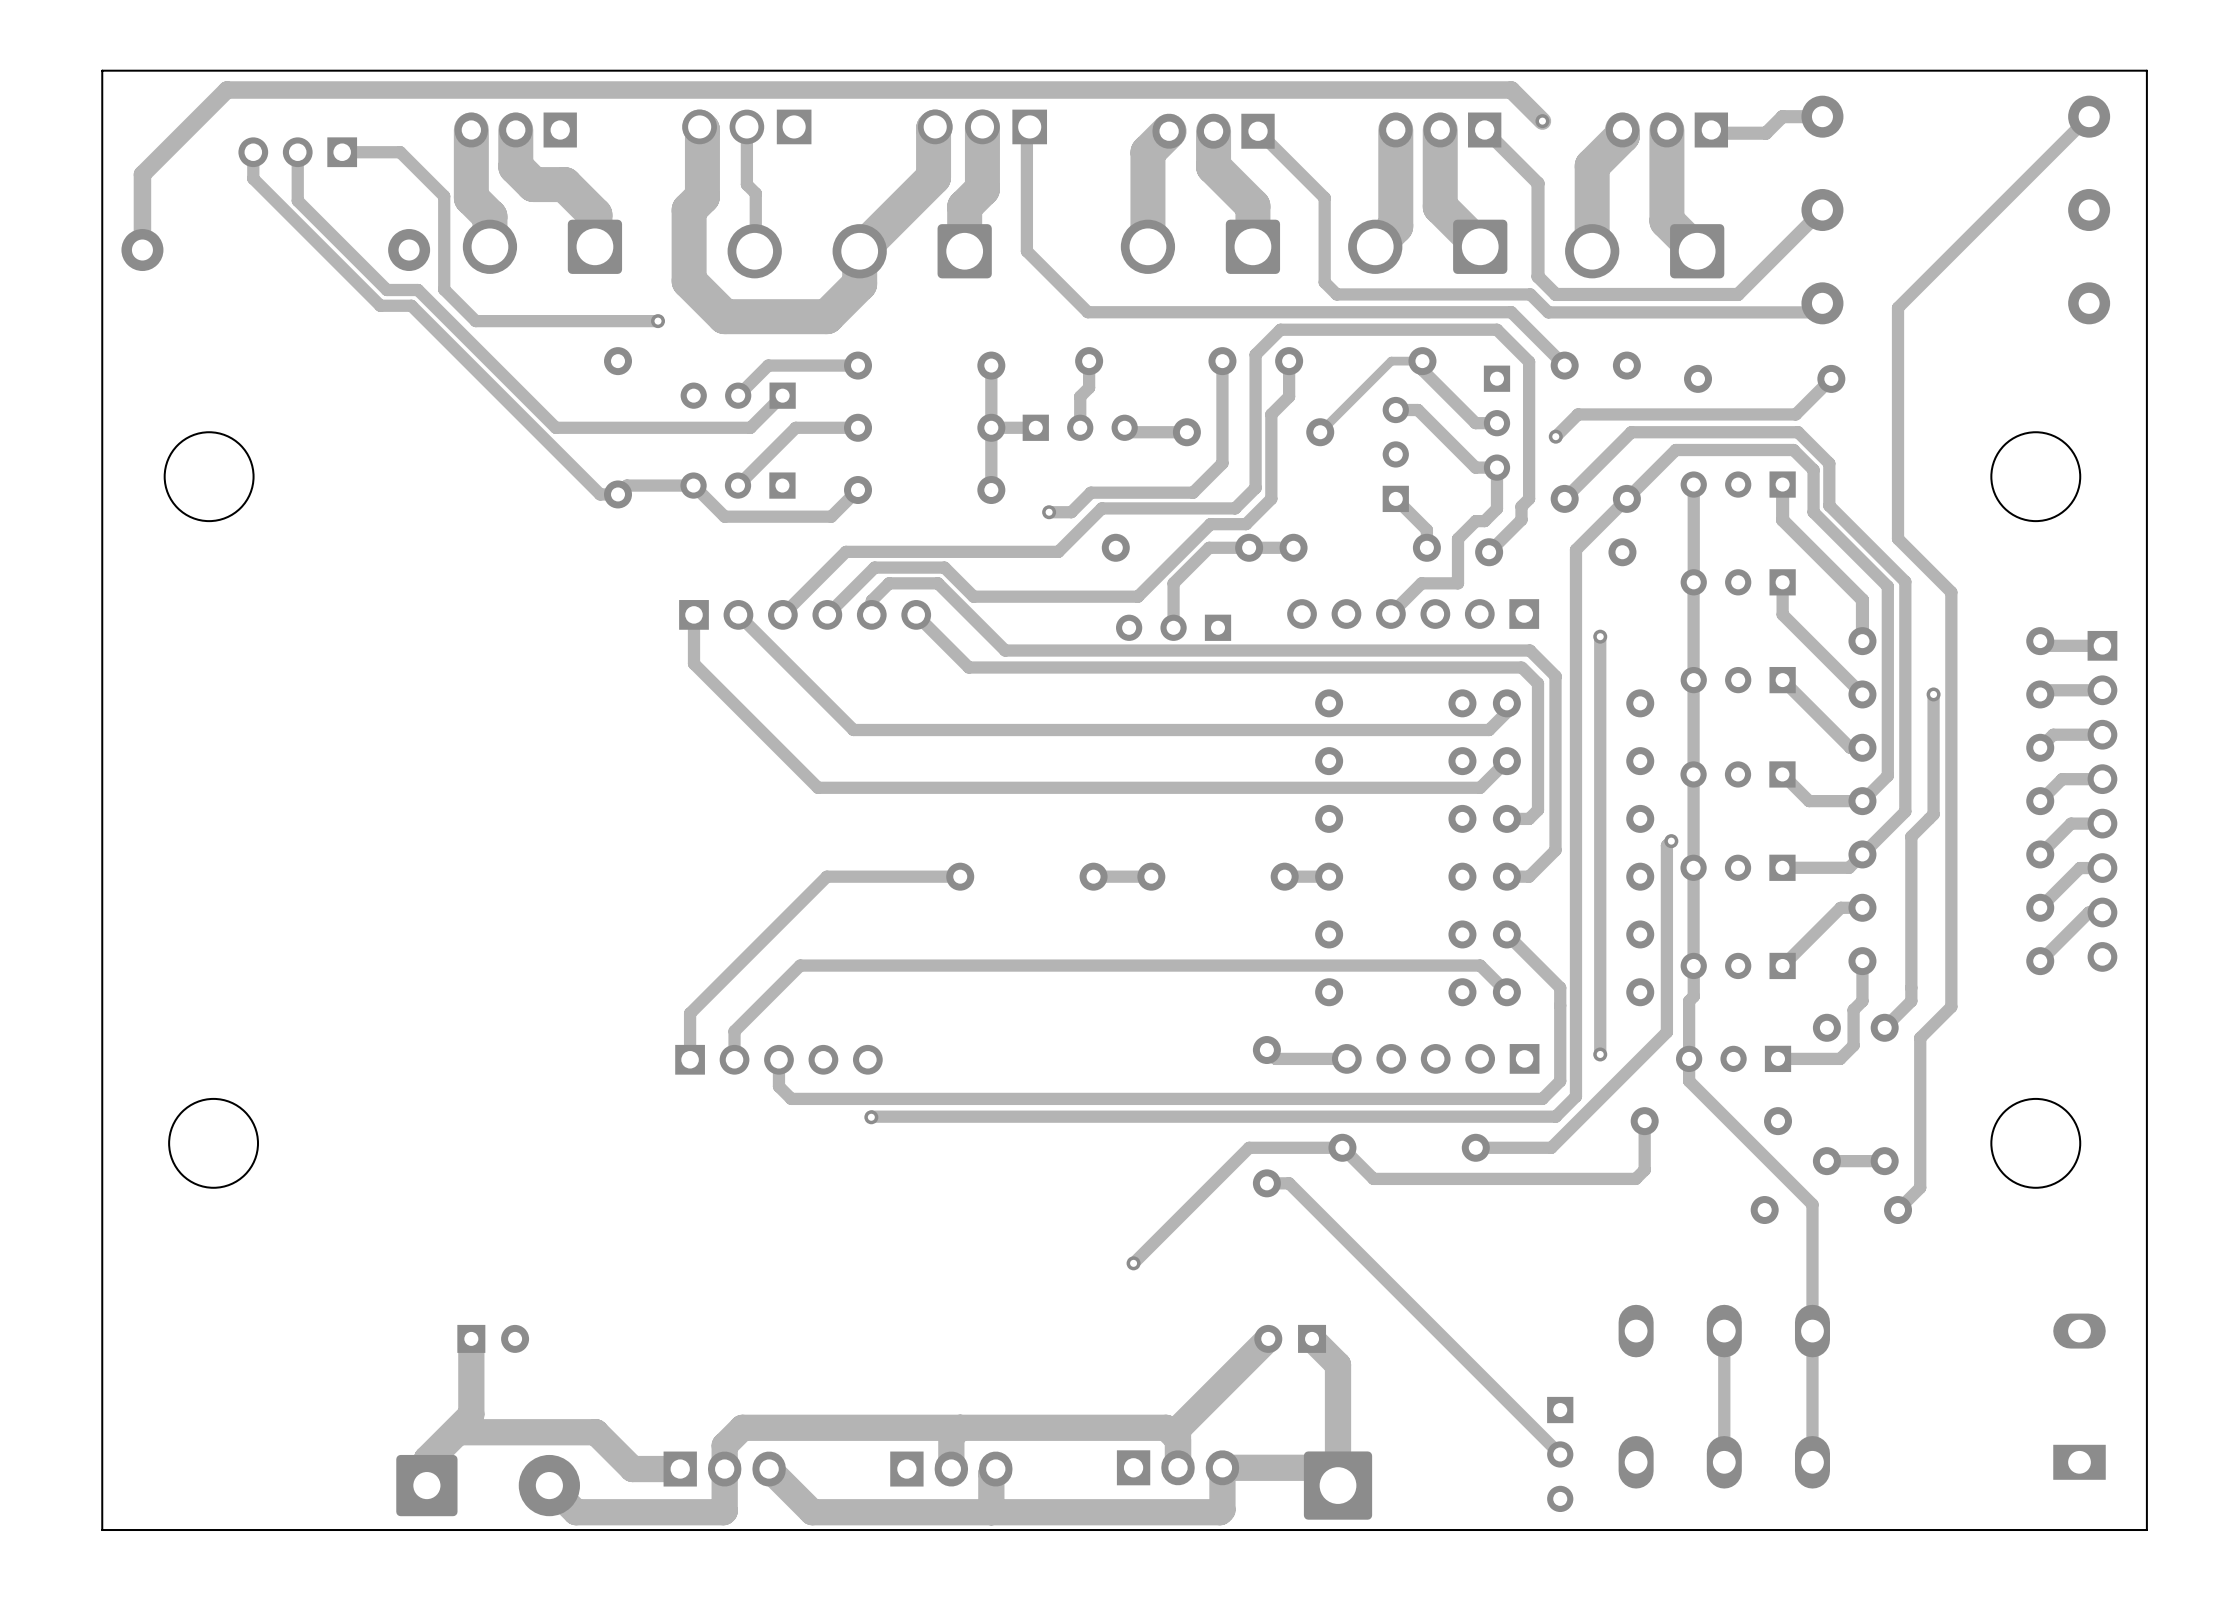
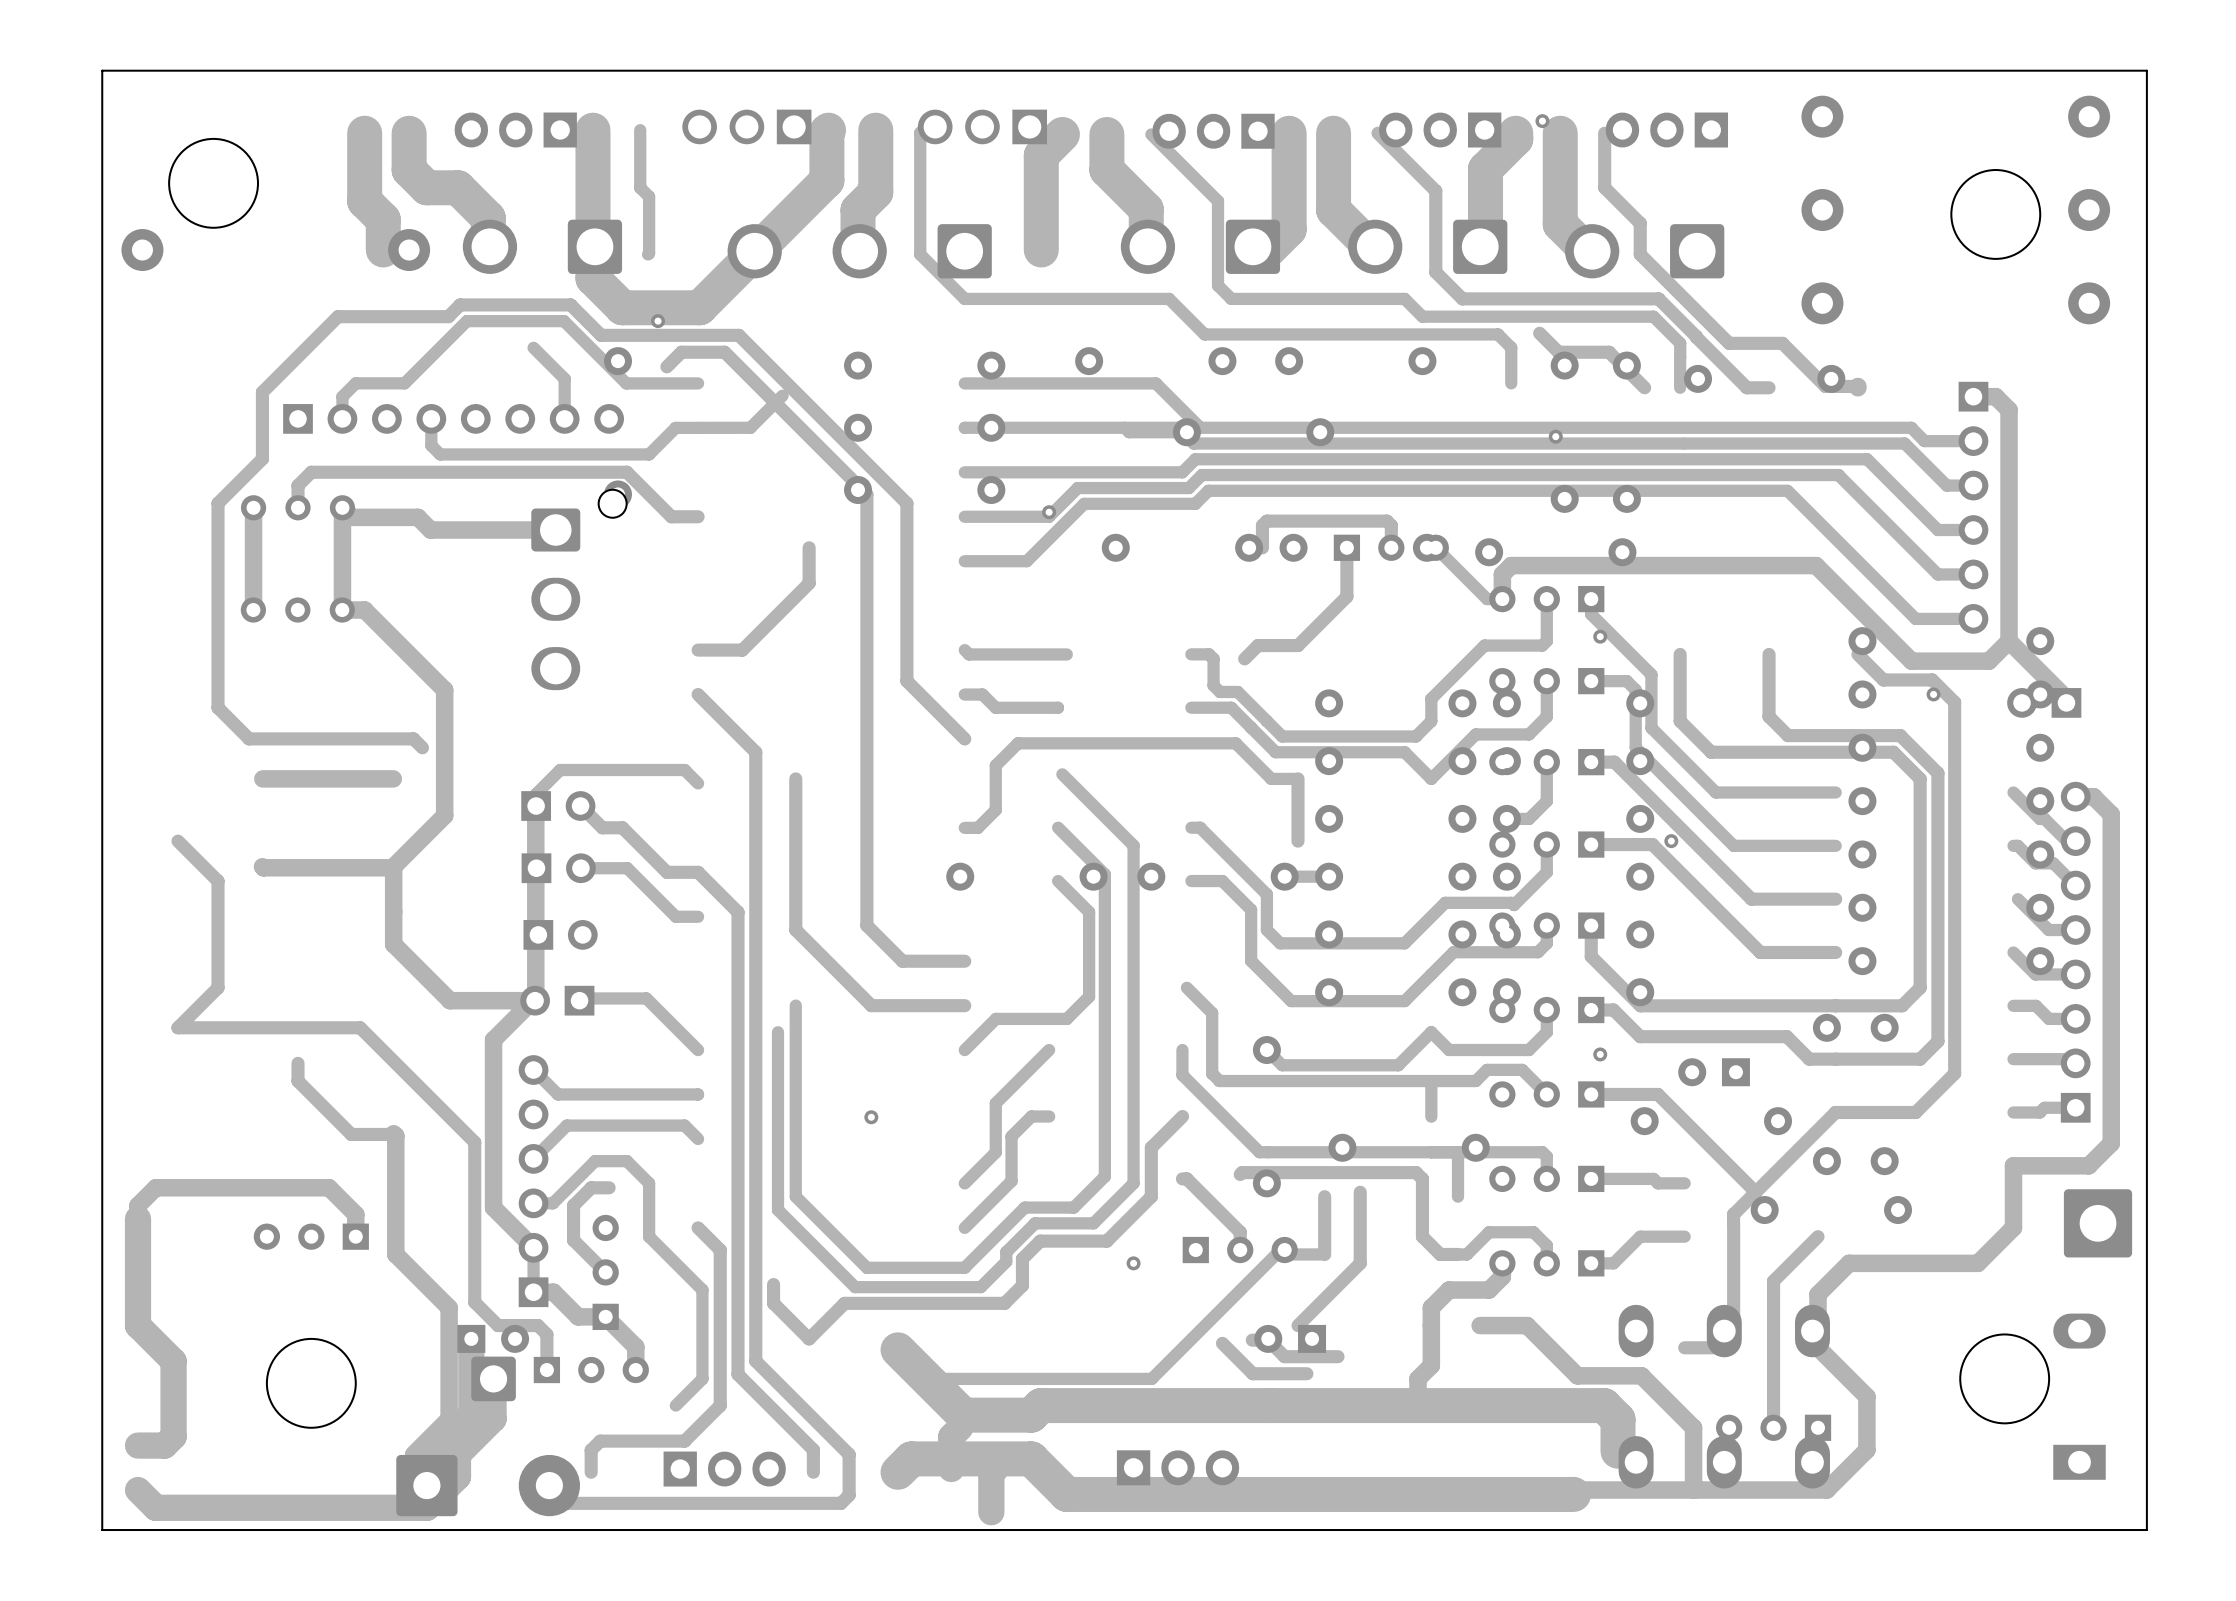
track: (1822, 116) (1782, 116) (1765, 133) (1711, 133) -> none
track: (2089, 116) (1898, 307) (1898, 538) (1951, 592) (1951, 1006) (1920, 1038) (1920, 1187) (1898, 1210) -> none
track: (1542, 121) (1511, 90) (226, 90) (142, 174) (142, 250) -> none
track: (746, 126) (746, 184) (755, 193) (754, 251) -> (640, 130) (640, 187) (649, 196) (648, 254)
track: (935, 126) (933, 128) (933, 177) (859, 251) (859, 283) (826, 316) (724, 316) (689, 281) (689, 210) (702, 196) (702, 129) (699, 126) -> none
track: (982, 126) (982, 189) (964, 206) (964, 251) -> (875, 130) (875, 192) (858, 210) (858, 254)
track: (1029, 126) (1026, 129) (1026, 251) (1087, 312) (1511, 312) (1564, 365) -> none
track: (471, 130) (471, 197) (489, 216) (489, 246) -> (364, 133) (364, 201) (383, 219) (383, 250)
track: (515, 130) (515, 166) (533, 184) (564, 184) (594, 214) (594, 246) -> (409, 133) (409, 170) (426, 187) (458, 187) (488, 218) (488, 250)
track: none -> (828, 130) (826, 131) (826, 180) (699, 307) (622, 307) (592, 278) (592, 130)
track: none -> (923, 130) (920, 132) (920, 254) (964, 298) (1169, 298) (1204, 334) (1498, 334) (1511, 347) (1511, 383)
track: (1395, 130) (1395, 226) (1375, 246) -> (1289, 133) (1289, 229) (1268, 250)
track: (1440, 130) (1440, 206) (1480, 246) -> (1333, 133) (1333, 210) (1373, 250)
track: (1484, 130) (1538, 183) (1538, 276) (1555, 294) (1738, 294) (1822, 210) -> none
track: (1622, 130) (1622, 135) (1592, 165) (1592, 251) -> (1515, 133) (1515, 138) (1485, 169) (1485, 254)
track: (1666, 130) (1666, 220) (1697, 251) -> (1560, 133) (1560, 224) (1590, 254)
track: (1169, 131) (1147, 152) (1147, 246) -> (1062, 134) (1041, 155) (1041, 250)
track: (1213, 131) (1213, 166) (1252, 206) (1252, 246) -> (1106, 134) (1106, 170) (1146, 209) (1146, 250)
track: (1258, 131) (1324, 197) (1324, 282) (1336, 294) (1530, 294) (1548, 312) (1813, 312) (1822, 303) -> none
track: none -> (1378, 133) (1435, 190) (1435, 272) (1462, 298) (1658, 298) (1746, 387) (1769, 387)
track: none -> (1604, 133) (1604, 187) (1640, 223) (1640, 254) (1729, 343) (1782, 343) (1825, 386) (1857, 387)
track: none -> (1151, 134) (1218, 201) (1218, 285) (1231, 298) (1404, 298) (1422, 316) (1653, 316) (1680, 343) (1680, 387)
track: (253, 152) (253, 178) (380, 305) (411, 305) (600, 494) (618, 494) (626, 485) (693, 485) (724, 516) (831, 516) (858, 490) -> none
track: (297, 152) (297, 200) (386, 290) (418, 290) (555, 427) (675, 427) -> (431, 418) (431, 445) (440, 454) (649, 454) (675, 427)
part: (297, 152) -> none
track: (342, 152) (400, 152) (444, 196) (444, 289) (475, 321) -> (342, 418) (342, 396) (355, 383) (404, 383) (466, 321) (475, 321)
track: (658, 321) (564, 321) -> (698, 383) (626, 383) (564, 321)
track: none -> (1539, 333) (1558, 352) (1609, 352) (1644, 387)
track: none -> (533, 347) (564, 378) (564, 418)
track: (1089, 361) (1089, 387) (1080, 396) (1080, 427) -> none
track: (1222, 361) (1222, 463) (1193, 492) (1090, 492) (1071, 512) (1049, 512) -> none
track: (1289, 361) (1289, 396) (1271, 414) (1271, 498) (1246, 524) (1210, 524) (1137, 596) (973, 596) (944, 567) (874, 567) (827, 614) -> none
track: (858, 365) (768, 365) (738, 395) -> none
track: (991, 365) (991, 490) -> none
track: none -> (666, 366) (681, 352) (724, 352) (866, 494) (866, 925) (902, 961) (964, 961)
track: (1831, 378) (1795, 414) (1578, 414) (1555, 436) -> none
track: none -> (964, 383) (1155, 383) (1200, 427) (1911, 427) (1924, 441) (1973, 441)
part: (738, 395) -> none
track: none -> (1973, 396) (1995, 396) (2009, 410) (2009, 641)
track: (1395, 410) (1418, 410) (1475, 467) (1496, 467) (1496, 508) (1484, 521) (1475, 521) (1458, 538) (1458, 583) (1421, 583) (1390, 614) -> none
part: none -> (453, 418)
track: (1496, 423) (1475, 423) (1422, 370) (1422, 361) (1391, 361) (1320, 432) -> none
part: (1496, 423) -> none
track: (858, 427) (795, 427) (738, 485) -> none
track: none -> (991, 427) (964, 427)
track: none -> (1035, 427) (1178, 427) (1193, 443) (1682, 443)
part: (1080, 427) -> none
track: none -> (1684, 443) (1904, 443) (1946, 485) (1973, 485)
part: (1395, 454) -> none
track: none -> (1866, 459) (1195, 459) (1182, 472) (964, 472)
track: none -> (1867, 459) (1937, 530) (1973, 530)
round board edge position: (209, 476) -> (213, 183)
round board edge position: (2035, 476) -> (1995, 214)
track: (1693, 484) (1693, 582) -> none
part: (1738, 484) -> none
track: (1782, 484) (1782, 520) (1862, 599) (1862, 641) -> none
part: (738, 485) -> none
track: none -> (1786, 490) (1208, 490) (1195, 503) (1084, 503) (1026, 561) (964, 561)
track: none -> (1787, 490) (1915, 618) (1973, 618)
track: (1395, 498) (1426, 530) (1426, 547) -> none
track: (1564, 498) (1631, 432) (1798, 432) (1829, 463) (1829, 505) (1905, 581) (1905, 811) (1849, 867) (1782, 867) -> none
track: none -> (253, 507) (253, 609)
track: none -> (298, 507) (298, 485) (311, 472) (626, 472) (671, 516) (698, 516)
part: none -> (298, 507)
part: none -> (1973, 507)
track: none -> (964, 516) (1049, 516) (1077, 488) (1188, 488) (1201, 475) (1838, 475) (1937, 574) (1973, 574)
track: none -> (555, 530) (430, 530) (418, 517) (352, 517) (342, 507) (342, 609)
track: none -> (809, 547) (809, 583) (742, 650) (698, 650)
track: (1293, 547) (1209, 547) (1173, 583) (1173, 627) -> none
track: none -> (1346, 547) (1346, 596) (1298, 645) (1258, 645) (1244, 658)
track: none -> (1391, 547) (1391, 525) (1386, 521) (1266, 521) (1262, 525) (1262, 547)
part: none -> (1391, 547)
track: none -> (1435, 547) (1487, 599) (1502, 599) (1502, 574) (1511, 565) (1816, 565) (1911, 661) (1989, 661) (2009, 641)
track: (1489, 552) (1521, 519) (1521, 506) (1529, 498) (1529, 361) (1496, 329) (1280, 329) (1255, 354) (1255, 487) (1235, 508) (1101, 508) (1058, 551) (845, 551) (782, 614) -> none
track: (1693, 582) (1693, 965) -> none
part: (1738, 582) -> none
track: (1782, 582) (1782, 614) (1862, 694) -> none
part: none -> (578, 589)
track: none -> (1546, 599) (1546, 641) (1542, 645) (1484, 645) (1431, 698) (1431, 721) (1415, 736) (1282, 736) (1237, 691) (1219, 691) (1213, 685) (1213, 658) (1209, 654) (1191, 654)
part: none -> (1546, 599)
track: none -> (1591, 599) (1591, 614) (1651, 674) (1651, 727) (1715, 792) (1835, 792)
part: none -> (297, 610)
track: none -> (342, 610) (364, 610) (444, 690) (444, 815) (392, 867) (262, 866)
track: (694, 614) (694, 663) (818, 787) (1480, 787) (1506, 761) -> none
track: (738, 614) (853, 730) (1489, 730) (1506, 712) (1506, 703) -> none
part: (805, 614) -> none
track: (871, 614) (871, 600) (889, 583) (938, 583) (1005, 650) (1529, 650) (1555, 676) -> none
track: (916, 614) (968, 667) (1520, 667) -> none
part: (1413, 614) -> none
part: (1173, 627) -> none
track: (1600, 636) (1600, 1054) -> none
track: none -> (2009, 641) (2066, 698) (2066, 702)
track: (2040, 641) (2044, 645) (2102, 645) -> none
track: none -> (964, 650) (969, 654) (1066, 654)
track: none -> (1680, 654) (1680, 721) (1711, 752) (1893, 752) (1920, 778) (1920, 987) (1902, 1005) (1640, 1005) (1591, 956) (1591, 925)
track: none -> (1769, 654) (1769, 716) (1787, 735) (1900, 735) (1937, 773) (1937, 1041) (1920, 1059) (1809, 1059) (1786, 1036) (1640, 1036) (1613, 1010) (1591, 1010)
track: none -> (1857, 654) (1883, 679) (1932, 679) (1954, 702) (1954, 1073) (1915, 1112) (1835, 1112) (1733, 1214) (1733, 1226)
track: (1521, 667) (1538, 683) (1538, 810) -> (1546, 762) (1546, 801) (1538, 810)
track: (1555, 676) (1555, 850) (1529, 876) (1506, 876) -> none
part: (1738, 680) -> none
track: (1782, 680) (1850, 747) (1862, 747) -> none
track: none -> (1546, 681) (1546, 716) (1529, 734) (1475, 734) (1431, 778) (1404, 752) (1275, 752) (1231, 707) (1191, 707)
part: none -> (1546, 681)
track: none -> (1591, 681) (1626, 681) (1635, 690) (1635, 747) (1733, 845) (1835, 845)
track: (2102, 690) (2044, 690) (2040, 694) -> none
track: none -> (698, 694) (755, 752) (755, 1361) (849, 1454) (849, 1495) (841, 1503) (555, 1503) (546, 1494) (546, 1472)
track: none -> (964, 694) (982, 694) (995, 707) (1057, 707)
track: (1933, 694) (1933, 814) (1911, 836) (1911, 1001) (1884, 1027) -> none
part: none -> (2044, 702)
track: (2102, 734) (2053, 734) (2040, 747) -> none
track: none -> (964, 738) (906, 681) (906, 503) (738, 335) (601, 335) (570, 304) (460, 304) (448, 316) (338, 316) (262, 392) (262, 458) (218, 503) (218, 707) (249, 738) (413, 738) (422, 747)
part: none -> (1546, 762)
track: none -> (1591, 762) (1614, 762) (1751, 899) (1835, 899)
track: none -> (1062, 774) (1133, 845) (1133, 1183) (1093, 1223) (1035, 1223) (1006, 1252) (1006, 1261) (980, 1287) (855, 1287) (778, 1210) (778, 1032)
part: (1738, 774) -> none
track: (1782, 774) (1809, 801) (1862, 801) (1887, 775) (1887, 586) (1813, 512) (1813, 469) (1793, 450) (1675, 450) (1575, 549) (1575, 1096) (1555, 1116) (871, 1117) -> none
track: none -> (393, 778) (262, 778)
track: none -> (795, 778) (795, 930) (871, 1005) (964, 1005)
track: (2102, 779) (2062, 779) (2040, 801) -> none
track: none -> (698, 783) (684, 770) (560, 770) (536, 794) (536, 874)
track: none -> (2013, 792) (2039, 818) (2044, 818) (2066, 841)
track: none -> (2075, 796) (2093, 796) (2111, 814) (2111, 1143) (2088, 1165) (2013, 1165) (2013, 1227) (1977, 1263) (1849, 1263) (1818, 1294) (1818, 1347) (1866, 1396) (1866, 1450) (1826, 1490) (1578, 1490) (1573, 1485)
part rotation: 0° (2102, 801) -> 180° (2075, 952)
track: none -> (536, 806) (535, 1000) (450, 1000) (393, 944) (393, 866)
part: none -> (558, 806)
track: none -> (580, 806) (602, 827) (622, 827) (666, 872) (698, 872) (738, 912) (738, 1374) (813, 1449) (813, 1472)
track: (2102, 823) (2071, 823) (2040, 854) -> none
track: none -> (964, 827) (977, 827) (995, 810) (995, 765) (1018, 743) (1235, 743) (1271, 778) (1298, 778) (1298, 841)
track: none -> (1058, 827) (1104, 874) (1104, 1176) (1073, 1207) (1024, 1207) (964, 1267) (866, 1267) (795, 1196) (795, 1005)
track: none -> (1191, 827) (1200, 827) (1266, 894) (1266, 930) (1280, 943) (1404, 943) (1445, 902) (1511, 902) (1514, 905) (1546, 872) (1546, 844)
track: none -> (178, 841) (218, 881) (218, 987) (178, 1027) (360, 1027) (474, 1142) (474, 1302) (498, 1325) (538, 1325) (546, 1334) (546, 1370)
track: (1671, 841) (1666, 845) (1666, 1032) (1551, 1147) (1475, 1147) -> none
part: none -> (1546, 844)
track: none -> (1591, 844) (1652, 844) (1760, 952) (1835, 952)
track: none -> (2013, 845) (2017, 845) (2035, 863) (2053, 863) (2075, 885)
part: (1738, 867) -> none
part: none -> (558, 868)
track: none -> (580, 868) (627, 868) (675, 916) (698, 916)
track: (2102, 868) (2079, 868) (2040, 907) -> none
track: (960, 876) (826, 876) (690, 1013) (690, 1059) -> none
track: (1151, 876) (1093, 876) -> none
track: none -> (1058, 881) (1089, 912) (1089, 996) (1066, 1018) (995, 1018) (964, 1050)
track: none -> (1191, 881) (1222, 881) (1251, 909) (1251, 961) (1291, 1001) (1404, 1001) (1453, 952) (1538, 952) (1546, 943) (1546, 925)
track: none -> (2017, 899) (2048, 930) (2075, 930)
track: (1862, 907) (1840, 907) (1782, 965) -> none
track: (2102, 912) (2088, 912) (2040, 961) -> none
part: none -> (1546, 925)
part: none -> (560, 934)
track: (1506, 934) (1560, 987) (1560, 1081) (1542, 1098) (791, 1098) (778, 1086) (778, 1059) -> none
track: none -> (2013, 952) (2035, 974) (2075, 974)
track: (1862, 961) (1862, 1001) (1853, 1010) (1853, 1045) (1840, 1058) (1782, 1058) -> none
track: (1693, 965) (1693, 996) (1689, 1001) (1689, 1081) (1812, 1204) (1812, 1462) -> none
part: (1738, 965) -> none
track: none -> (1186, 987) (1212, 1013) (1212, 1073) (1219, 1081) (1475, 1081) (1487, 1069) (1522, 1069) (1546, 1094)
track: (1506, 992) (1480, 965) (800, 965) (734, 1031) (734, 1059) -> none
track: none -> (580, 998) (646, 998) (698, 1050)
track: none -> (532, 1000) (493, 1039) (493, 1207) (533, 1247) (533, 1292) (553, 1292) (578, 1316) (605, 1316) (635, 1346) (635, 1370)
part: none -> (557, 1000)
track: none -> (2013, 1005) (2035, 1005) (2049, 1018) (2066, 1018)
part: none -> (1546, 1010)
track: none -> (1049, 1050) (995, 1103) (995, 1152) (964, 1183)
track: none -> (1182, 1050) (1182, 1075) (1259, 1152) (1542, 1152) (1546, 1156) (1546, 1178)
track: (1346, 1058) (1275, 1058) -> (1546, 1010) (1546, 1032) (1529, 1050) (1449, 1050) (1431, 1032) (1398, 1065) (1282, 1065) (1275, 1058)
part: (1435, 1058) -> none
part: (1733, 1058) -> none
part: (778, 1059) -> none
track: none -> (2013, 1059) (2071, 1059) (2075, 1063)
track: none -> (298, 1063) (298, 1081) (351, 1134) (393, 1133) (395, 1135) (395, 1254) (449, 1307) (449, 1418) (413, 1454)
track: none -> (533, 1070) (558, 1094) (698, 1094)
part: none -> (1714, 1072)
track: none -> (1431, 1085) (1431, 1116)
part: none -> (1546, 1094)
track: none -> (1591, 1094) (1658, 1094) (1755, 1192)
track: none -> (2075, 1107) (2044, 1107) (2039, 1112) (2013, 1112)
track: none -> (1049, 1116) (1031, 1116) (1011, 1136) (1011, 1181) (964, 1227)
track: none -> (1182, 1116) (1151, 1147) (1151, 1196) (1106, 1241) (1040, 1241) (1022, 1258) (1022, 1285) (1004, 1303) (844, 1303) (809, 1338) (773, 1303) (773, 1284)
track: (1644, 1121) (1644, 1170) (1635, 1178) -> (1684, 1183) (1658, 1183) (1653, 1178) (1635, 1178)
track: none -> (698, 1138) (684, 1125) (566, 1125) (533, 1158)
round board edge position: (213, 1143) -> (311, 1383)
round board edge position: (2035, 1143) -> (2004, 1378)
track: none -> (1458, 1152) (1458, 1196)
track: (1884, 1161) (1826, 1161) -> none
track: none -> (1240, 1174) (1242, 1172) (1416, 1172) (1422, 1178) (1422, 1236) (1440, 1254) (1466, 1254) (1489, 1232) (1533, 1232) (1546, 1245) (1546, 1263)
track: none -> (1182, 1178) (1186, 1178) (1240, 1232) (1240, 1250)
part: none -> (1546, 1178)
track: (1591, 1178) (1373, 1178) (1342, 1147) (1249, 1147) (1133, 1263) -> none
part: none -> (533, 1181)
track: (1266, 1183) (1289, 1183) (1560, 1454) -> none
track: none -> (609, 1187) (591, 1187) (573, 1205) (573, 1240) (605, 1272)
track: none -> (1360, 1192) (1360, 1263) (1298, 1325)
track: none -> (1324, 1196) (1324, 1254) (1289, 1254) (1284, 1250) (1280, 1250) (1151, 1378) (927, 1378) (898, 1349) (963, 1415) (1031, 1415) (1040, 1405) (1604, 1405) (1618, 1419) (1618, 1451)
track: none -> (533, 1203) (552, 1203) (595, 1161) (626, 1161) (649, 1183) (649, 1236) (702, 1290) (702, 1378) (675, 1405)
part: none -> (2098, 1223)
track: none -> (1733, 1226) (1733, 1334) (1720, 1347) (1684, 1347)
track: none -> (698, 1227) (720, 1250) (720, 1405) (684, 1441) (600, 1441) (591, 1450) (591, 1472)
part: none -> (311, 1236)
track: none -> (355, 1236) (355, 1214) (329, 1187) (155, 1187) (138, 1205) (138, 1325) (173, 1361) (173, 1436) (164, 1445) (138, 1445)
track: none -> (1684, 1236) (1640, 1236) (1613, 1263) (1591, 1263)
track: none -> (1818, 1236) (1773, 1281) (1773, 1427)
part: none -> (1240, 1250)
track: none -> (1502, 1263) (1502, 1276) (1489, 1290) (1449, 1290) (1431, 1307) (1431, 1365) (1418, 1378) (1418, 1405) (1415, 1407) (1413, 1405)
part: none -> (1546, 1263)
part: none -> (605, 1272)
track: none -> (1480, 1325) (1527, 1325) (1577, 1375) (1641, 1375) (1693, 1427) (1693, 1490)
track: (1724, 1331) (1724, 1462) -> none
track: (1268, 1338) (1178, 1429) (1178, 1467) -> none
track: (1312, 1338) (1338, 1364) (1338, 1485) (1320, 1467) (1222, 1467) (1222, 1509) (1220, 1512) (812, 1512) (769, 1469) -> none
track: none -> (1252, 1340) (1268, 1340) (1284, 1356) (1338, 1356)
track: none -> (1222, 1343) (1252, 1373) (1306, 1373)
part: none -> (591, 1370)
track: none -> (493, 1378) (493, 1418) (458, 1454) (458, 1476) (426, 1507) (155, 1507) (138, 1490)
part: none -> (493, 1378)
part: none -> (1773, 1427)
track: (1178, 1439) (1166, 1427) (742, 1427) (724, 1445) (723, 1512) (576, 1512) (549, 1485) -> none
part: (1560, 1454) -> none
track: (426, 1463) (458, 1432) (595, 1432) (632, 1469) (680, 1469) -> none
part: (951, 1469) -> none
track: none -> (898, 1472) (911, 1458) (1031, 1458) (1066, 1494) (1573, 1494)
part: (1338, 1485) -> none

